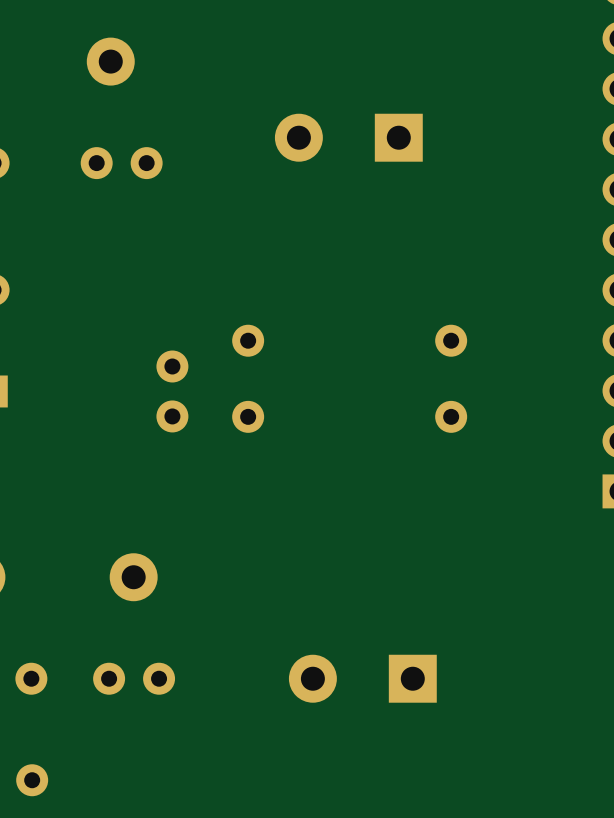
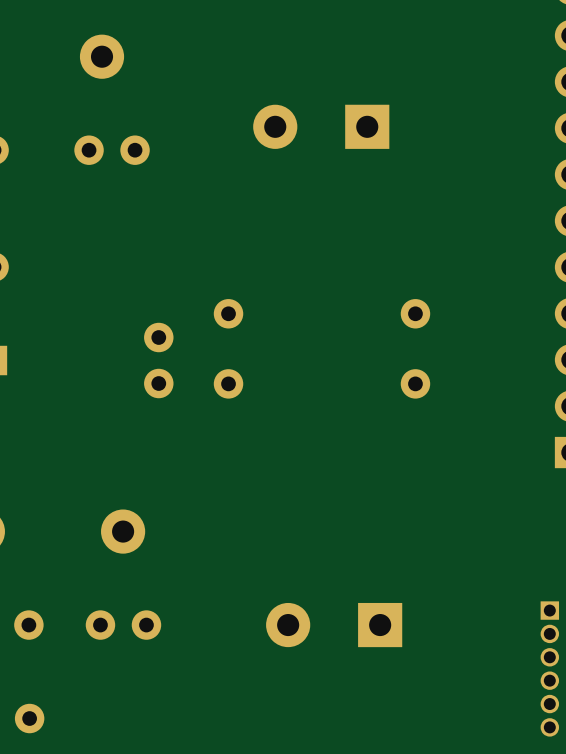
part: none -> (549, 668)

